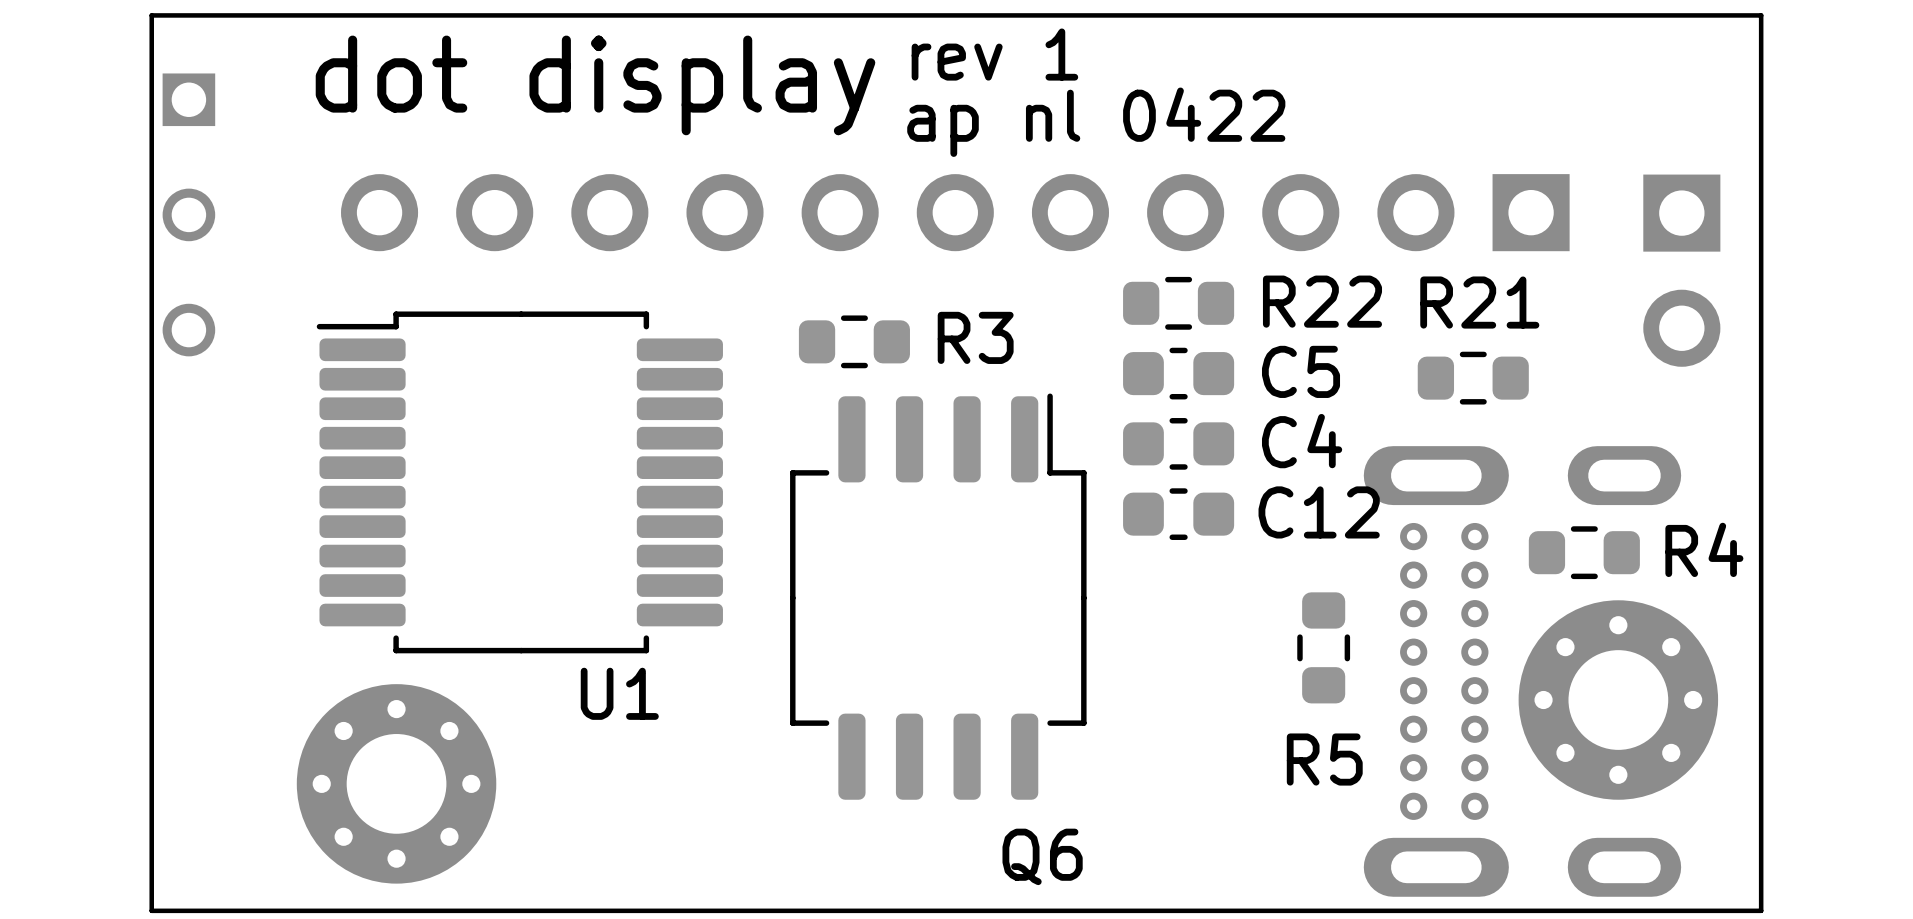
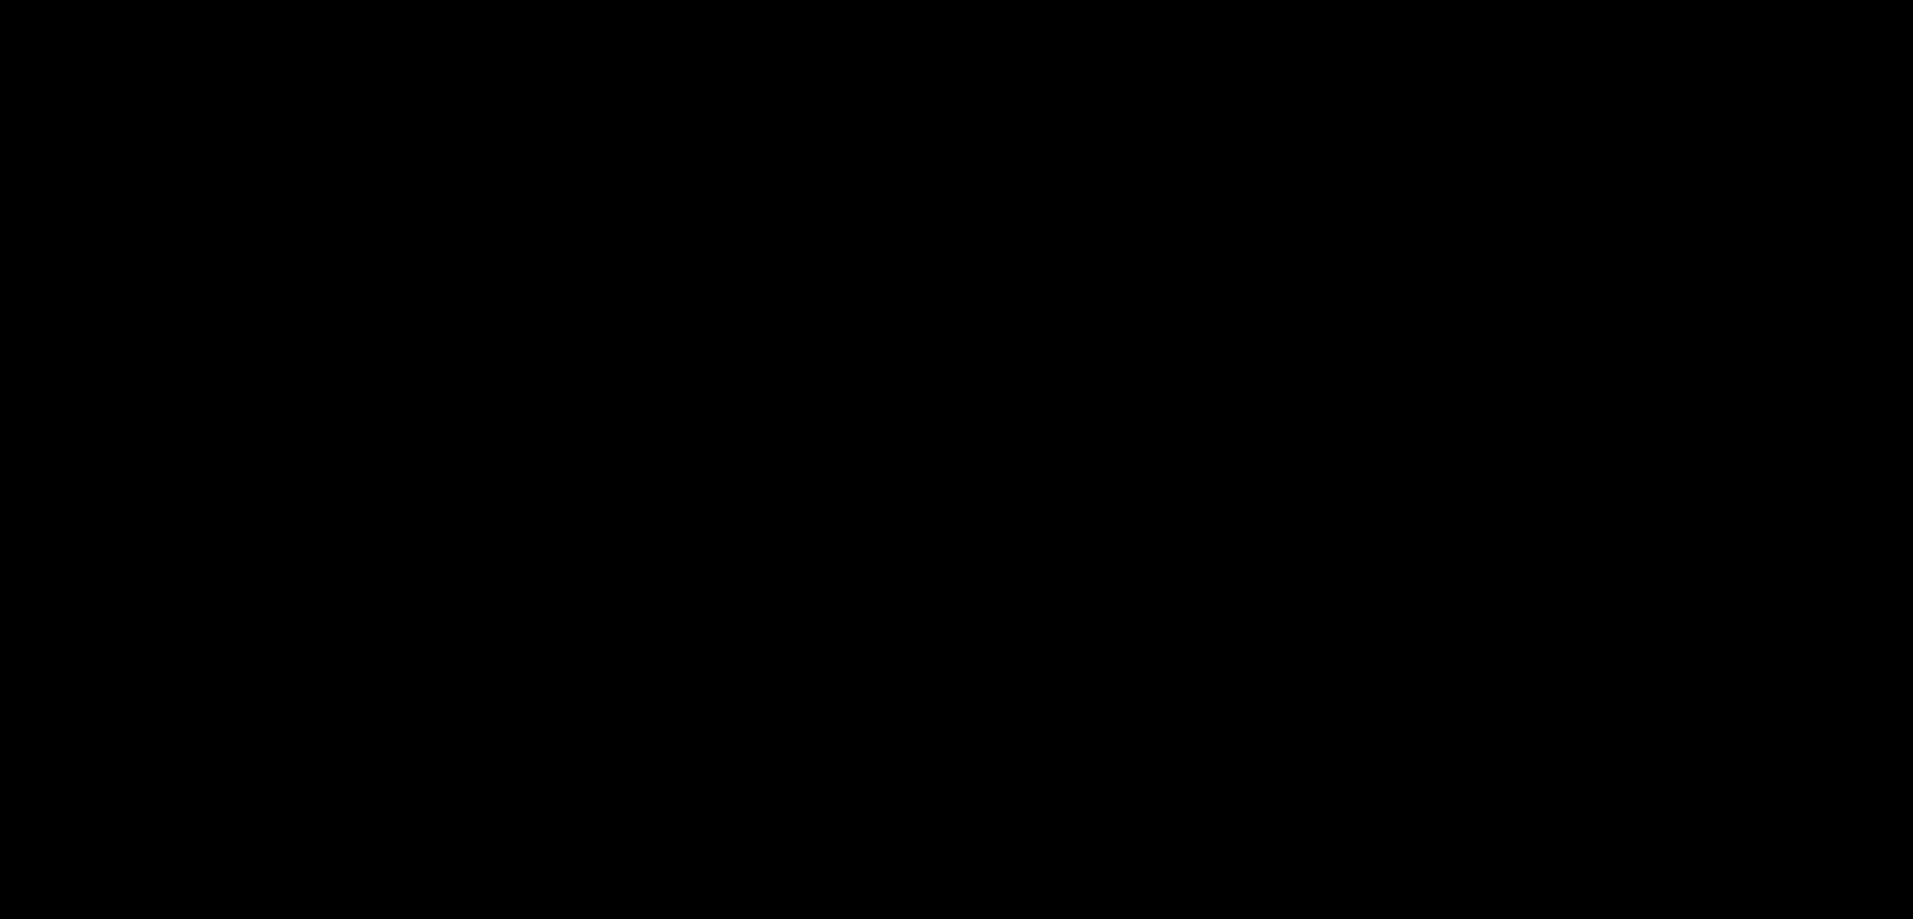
board edge: (1761, 15) (1761, 910) (151, 910) (151, 15) (1761, 15) -> none
text: rev 1 (994, 54) -> none
text: dot display (595, 85) -> none
text: ap nl 0422 (1096, 122) -> none
part: (955, 212) -> none
part: (188, 214) -> none
part: (1681, 270) -> none
R22: (1178, 303) -> none
R3: (854, 341) -> none
C5: (1178, 373) -> none
R21: (1473, 378) -> none
C4: (1178, 443) -> none
U1: (519, 482) -> none
C12: (1178, 514) -> none
R4: (1584, 552) -> none
Q6: (938, 596) -> none
R5: (1323, 647) -> none
part: (1522, 671) -> none
part: (1618, 700) -> none
part: (396, 783) -> none

